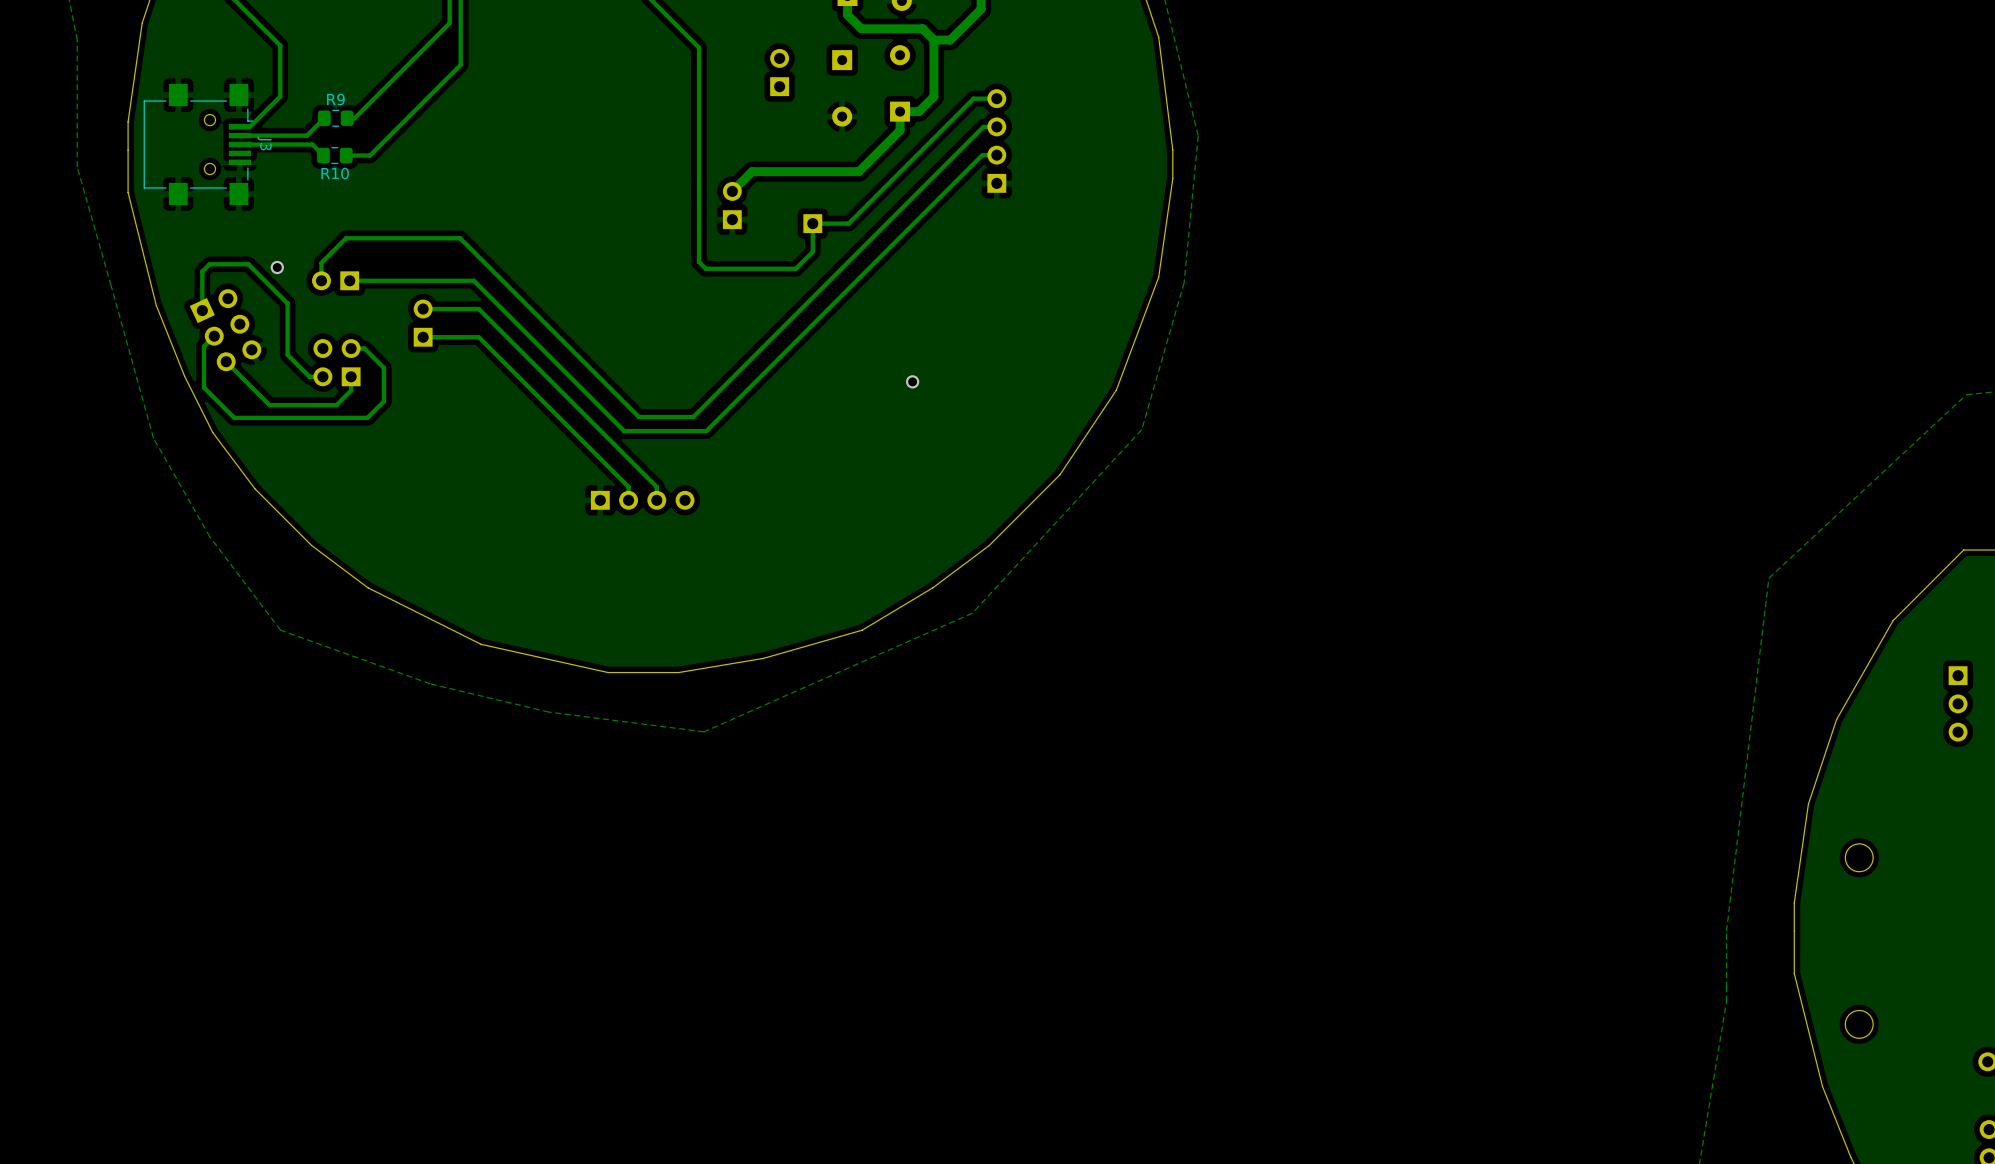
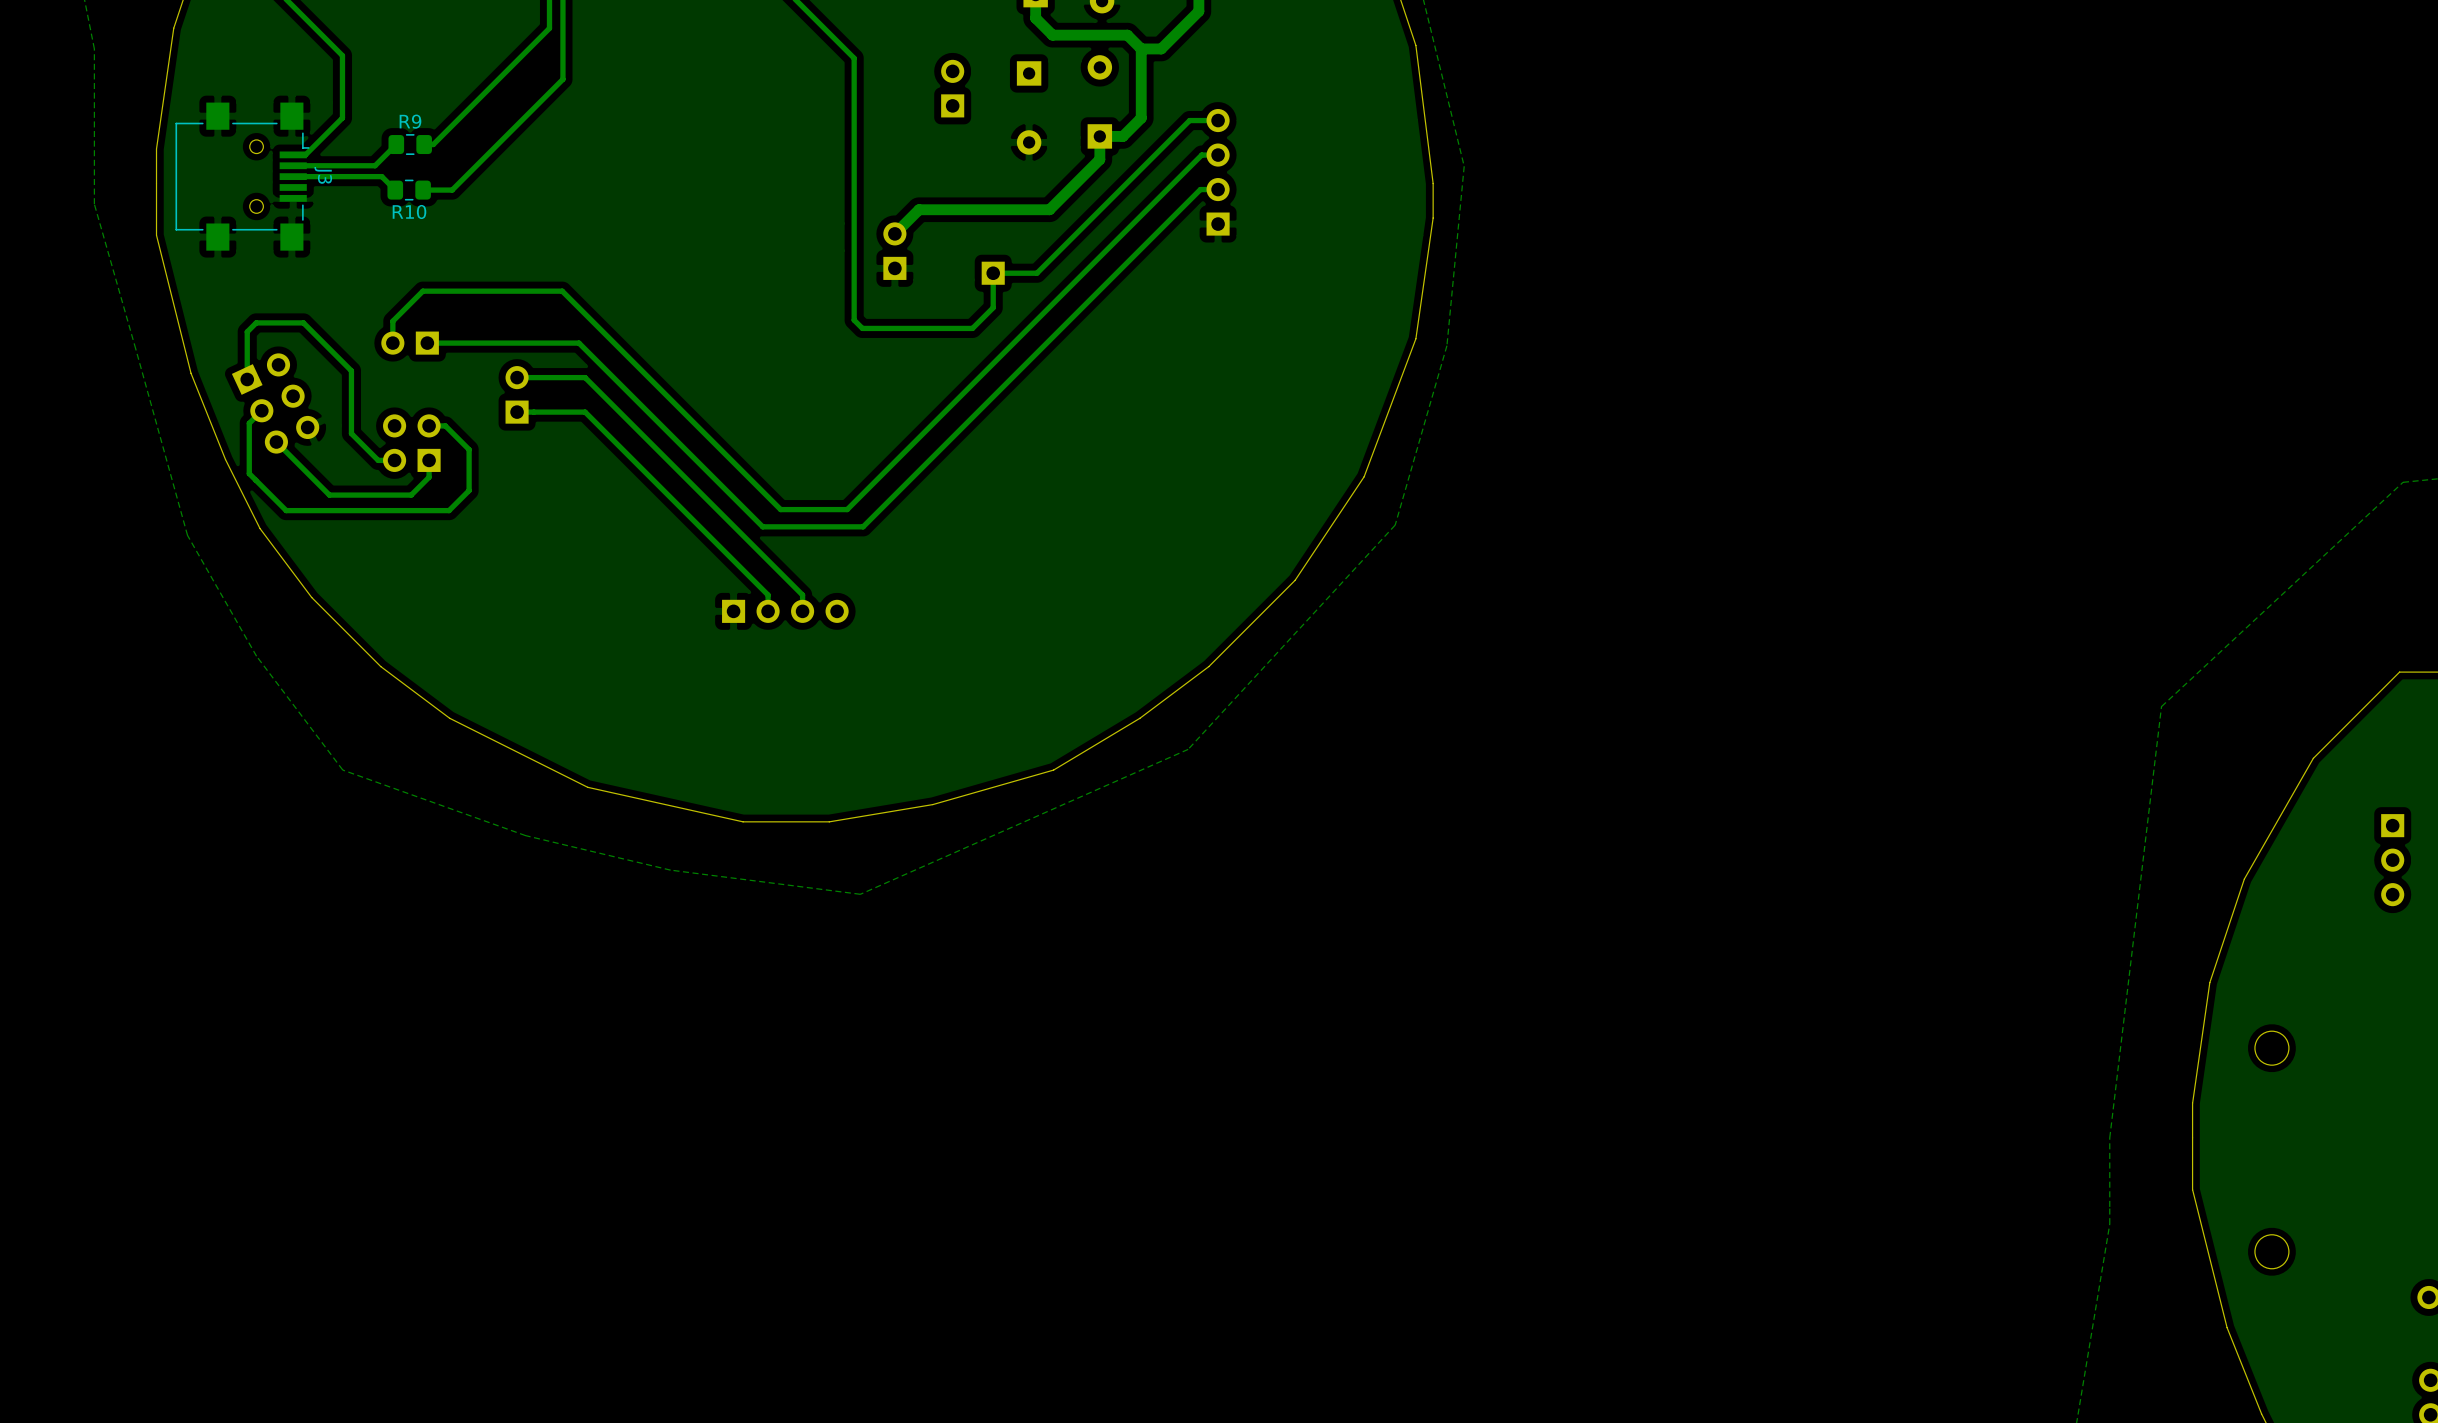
via: (277, 267) -> none
via: (912, 381) -> none

